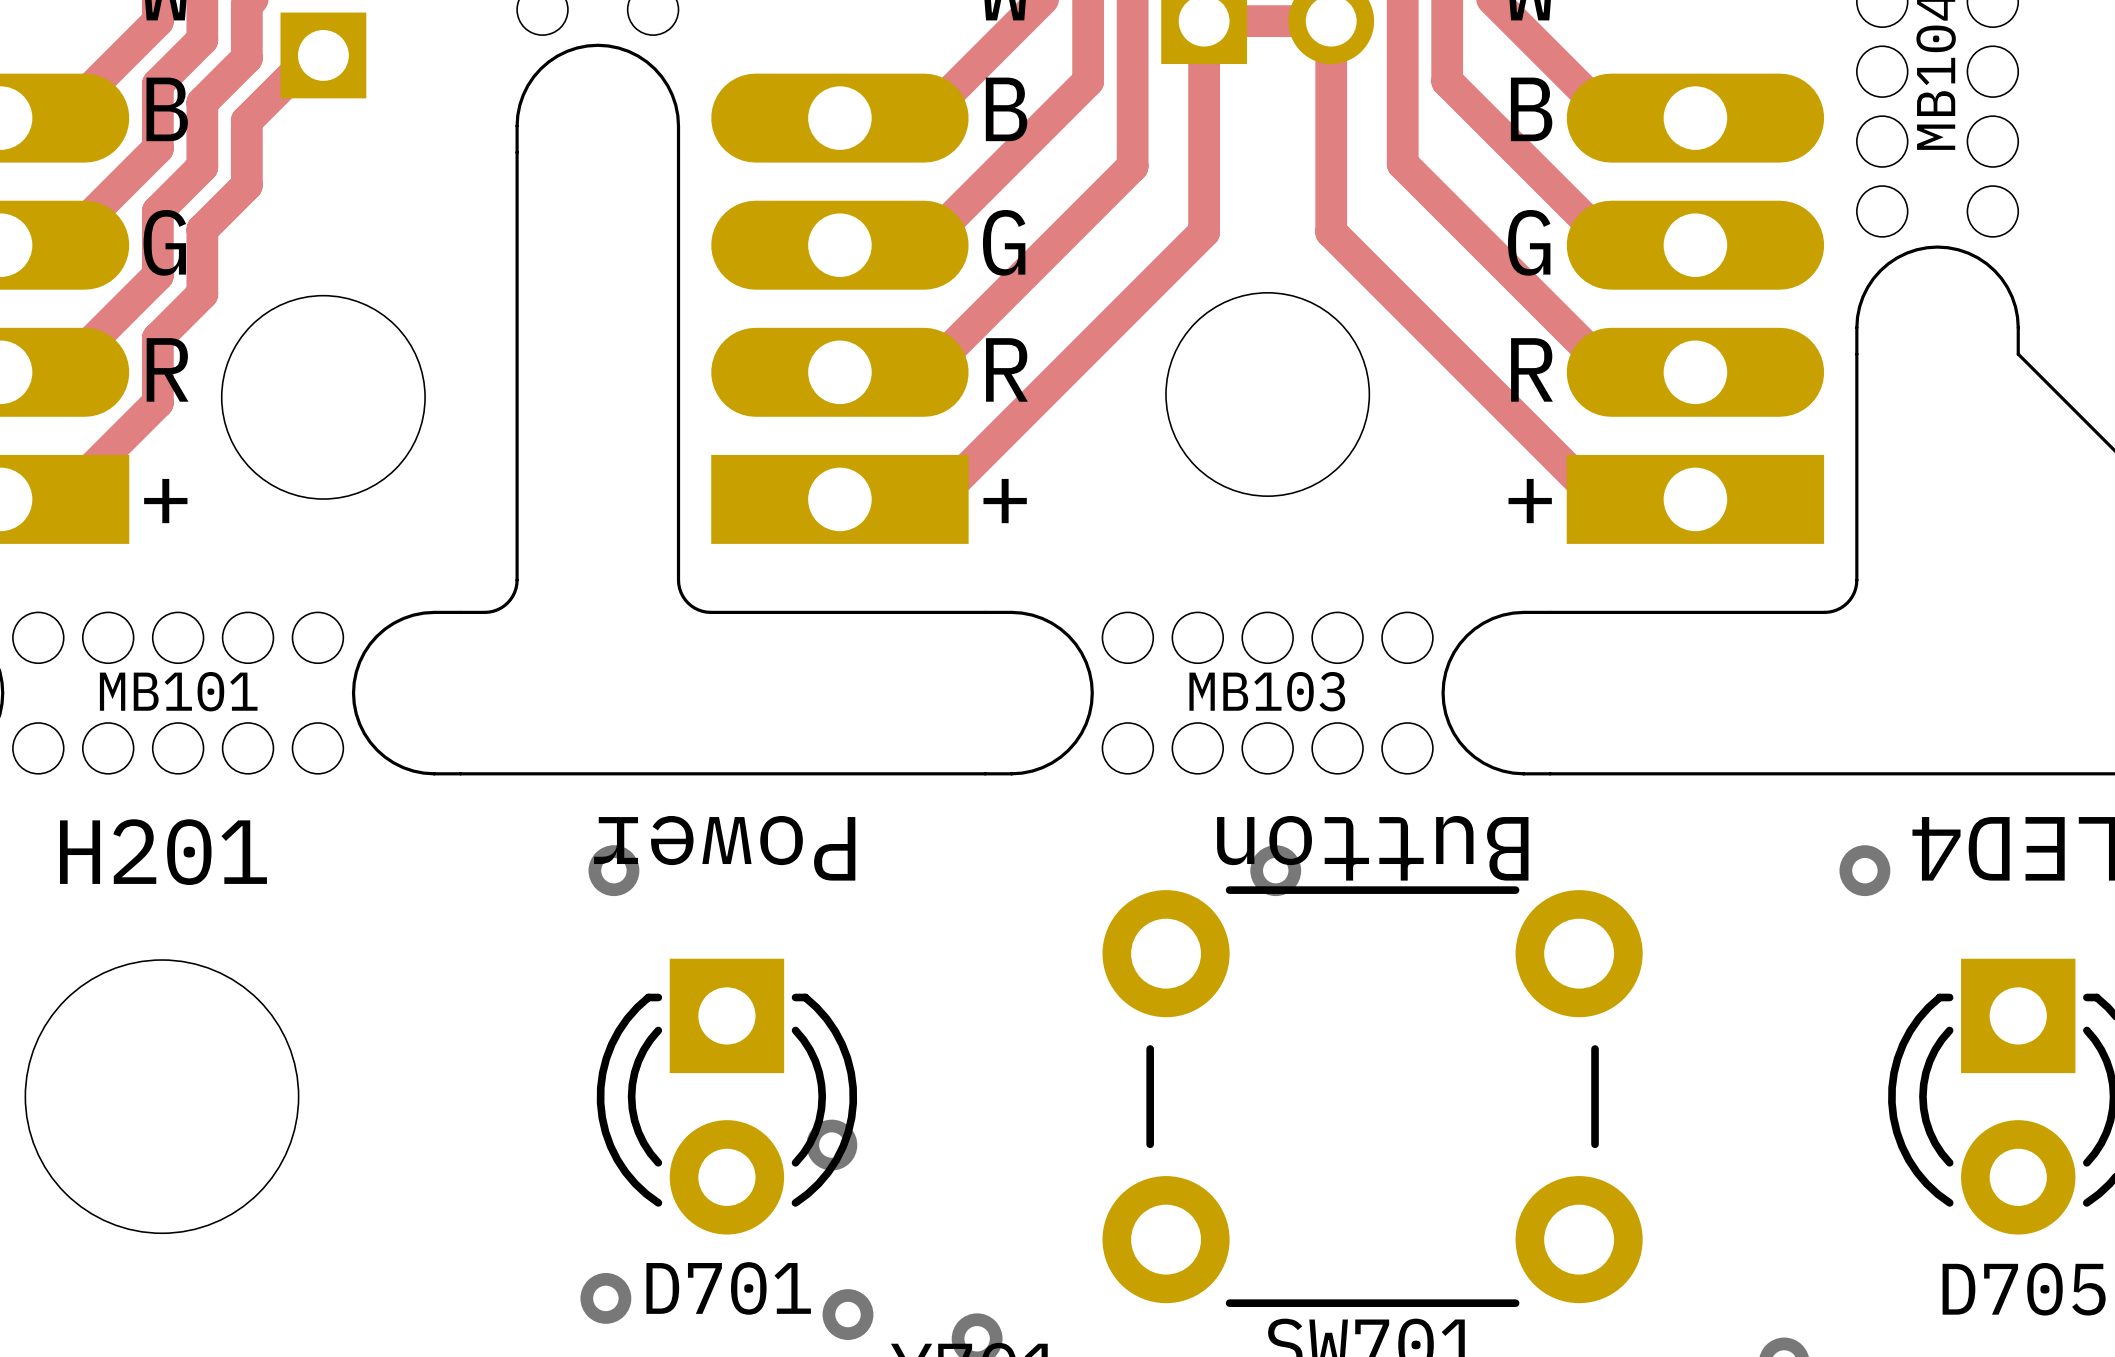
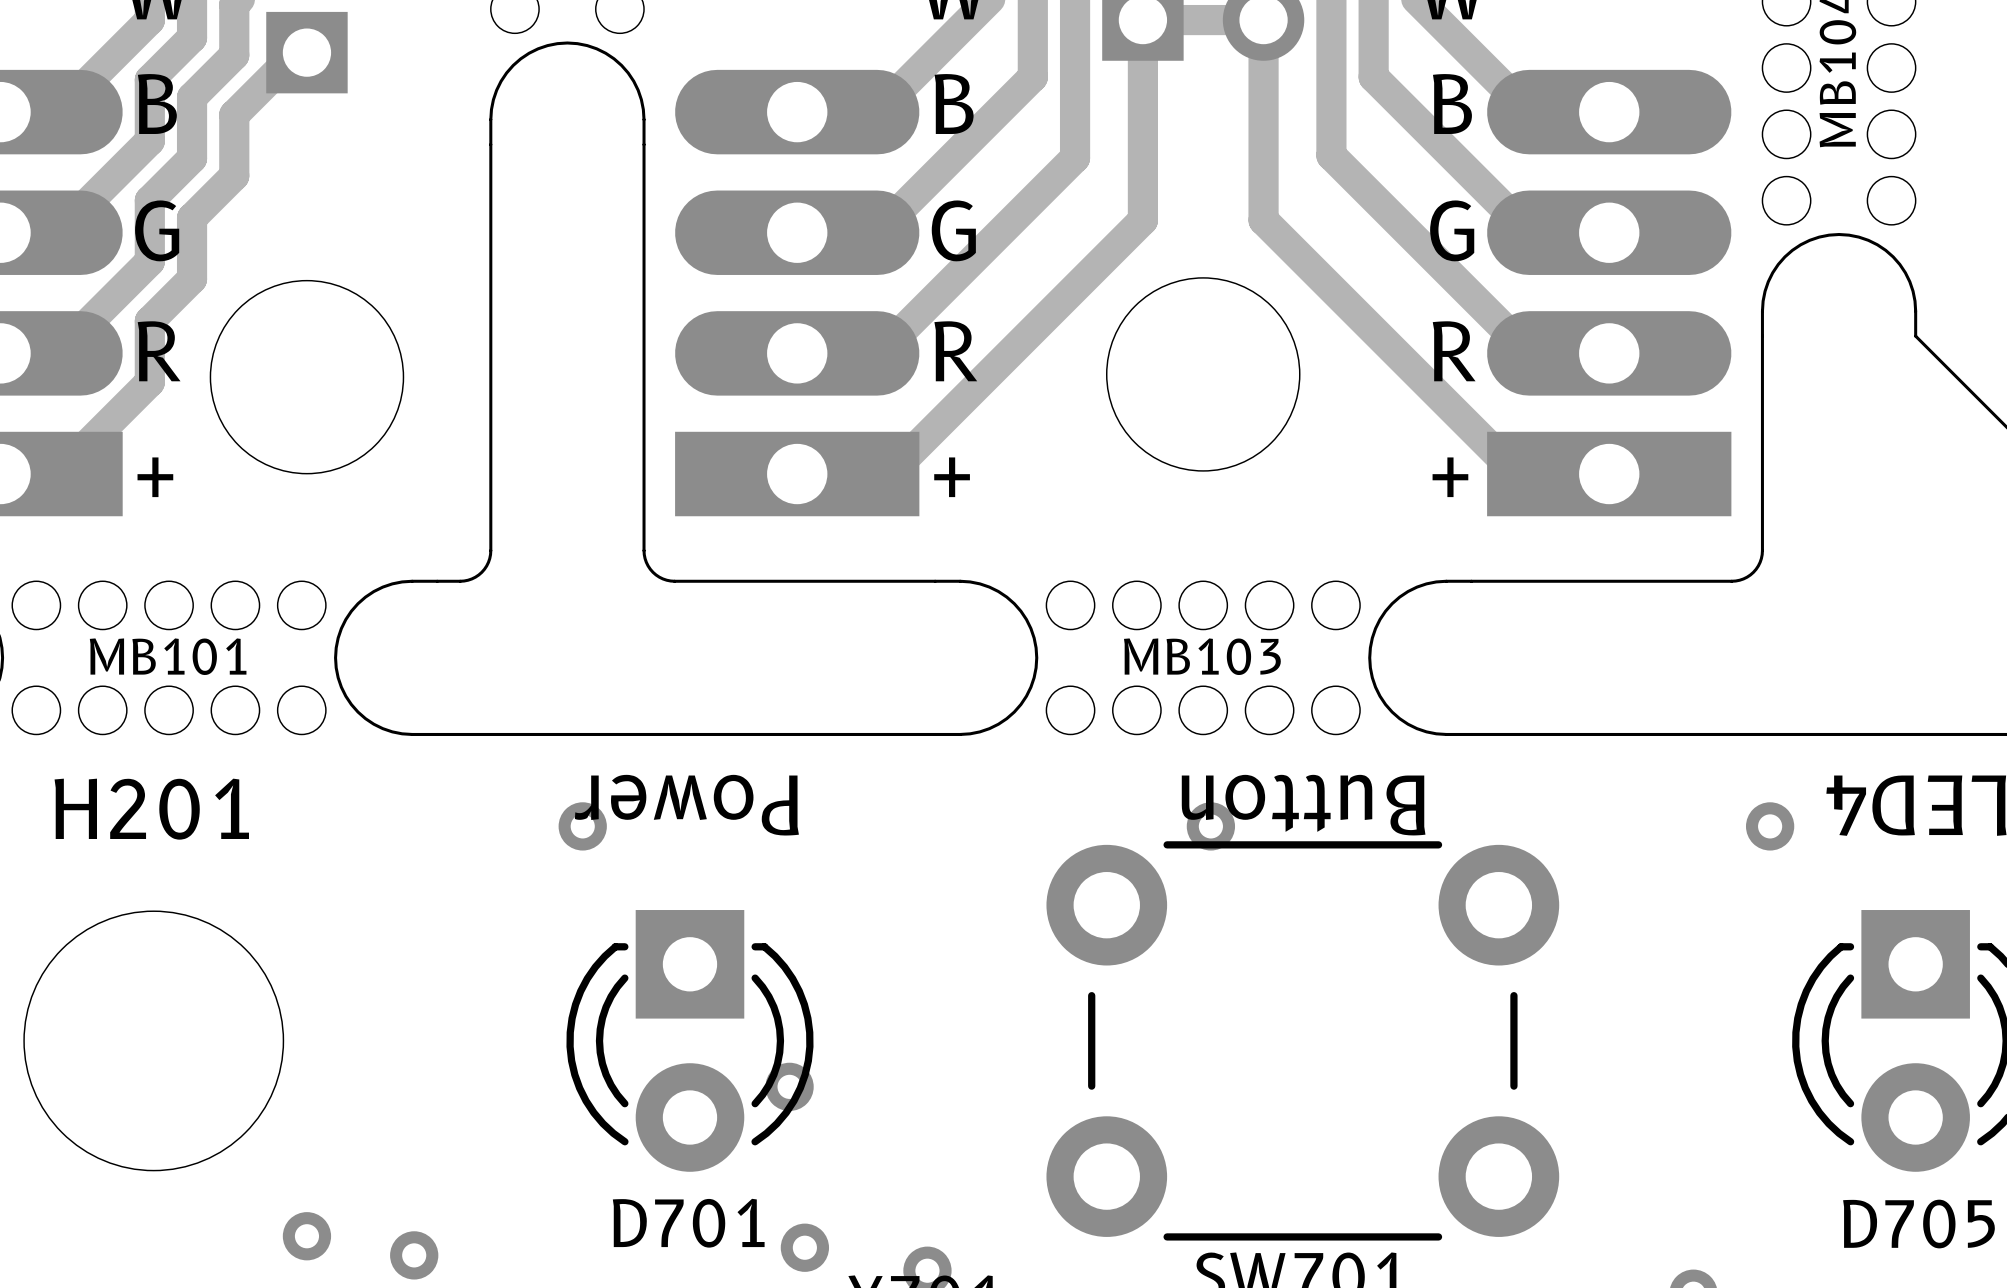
via: (605, 1298) -> none
via: none -> (306, 1236)
via: none -> (414, 1255)

